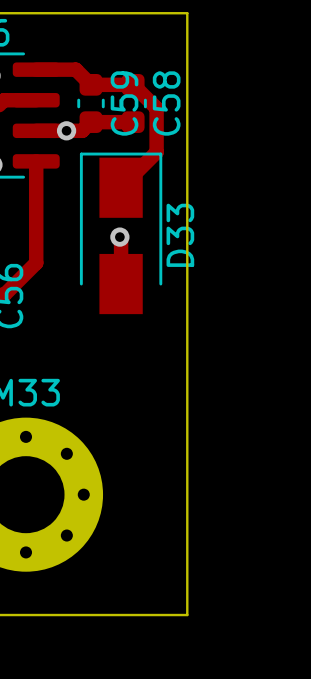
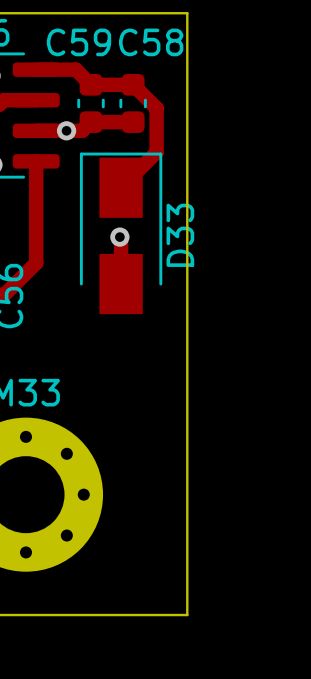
C59 name rotation: 0° (124, 103) -> 90° clockwise (78, 42)
C58 name rotation: 0° (166, 103) -> 90° clockwise (151, 42)

